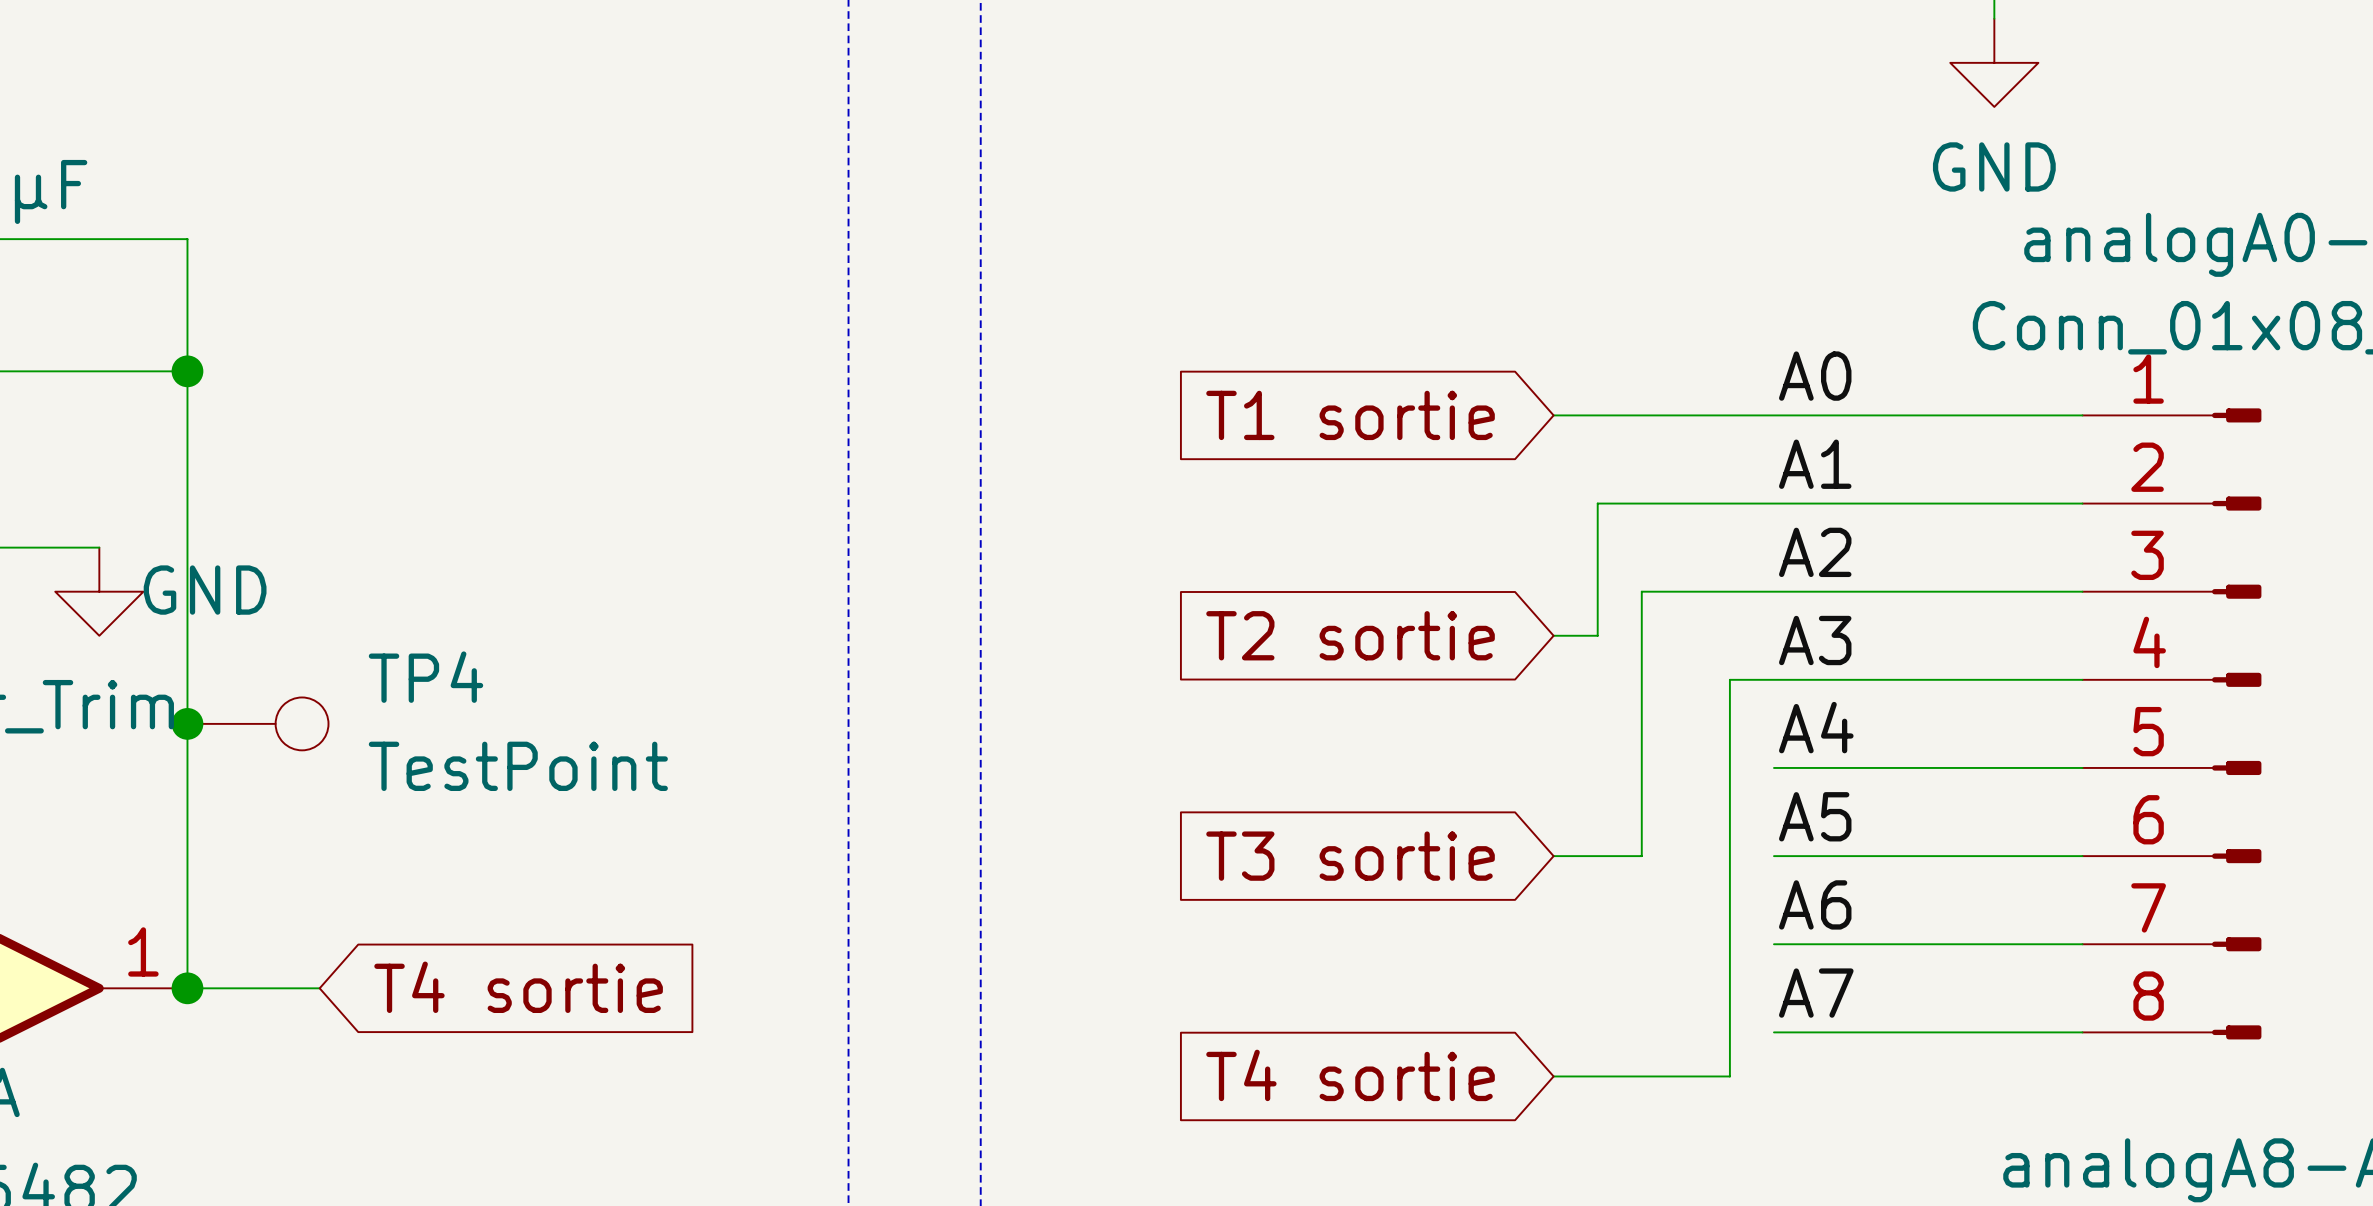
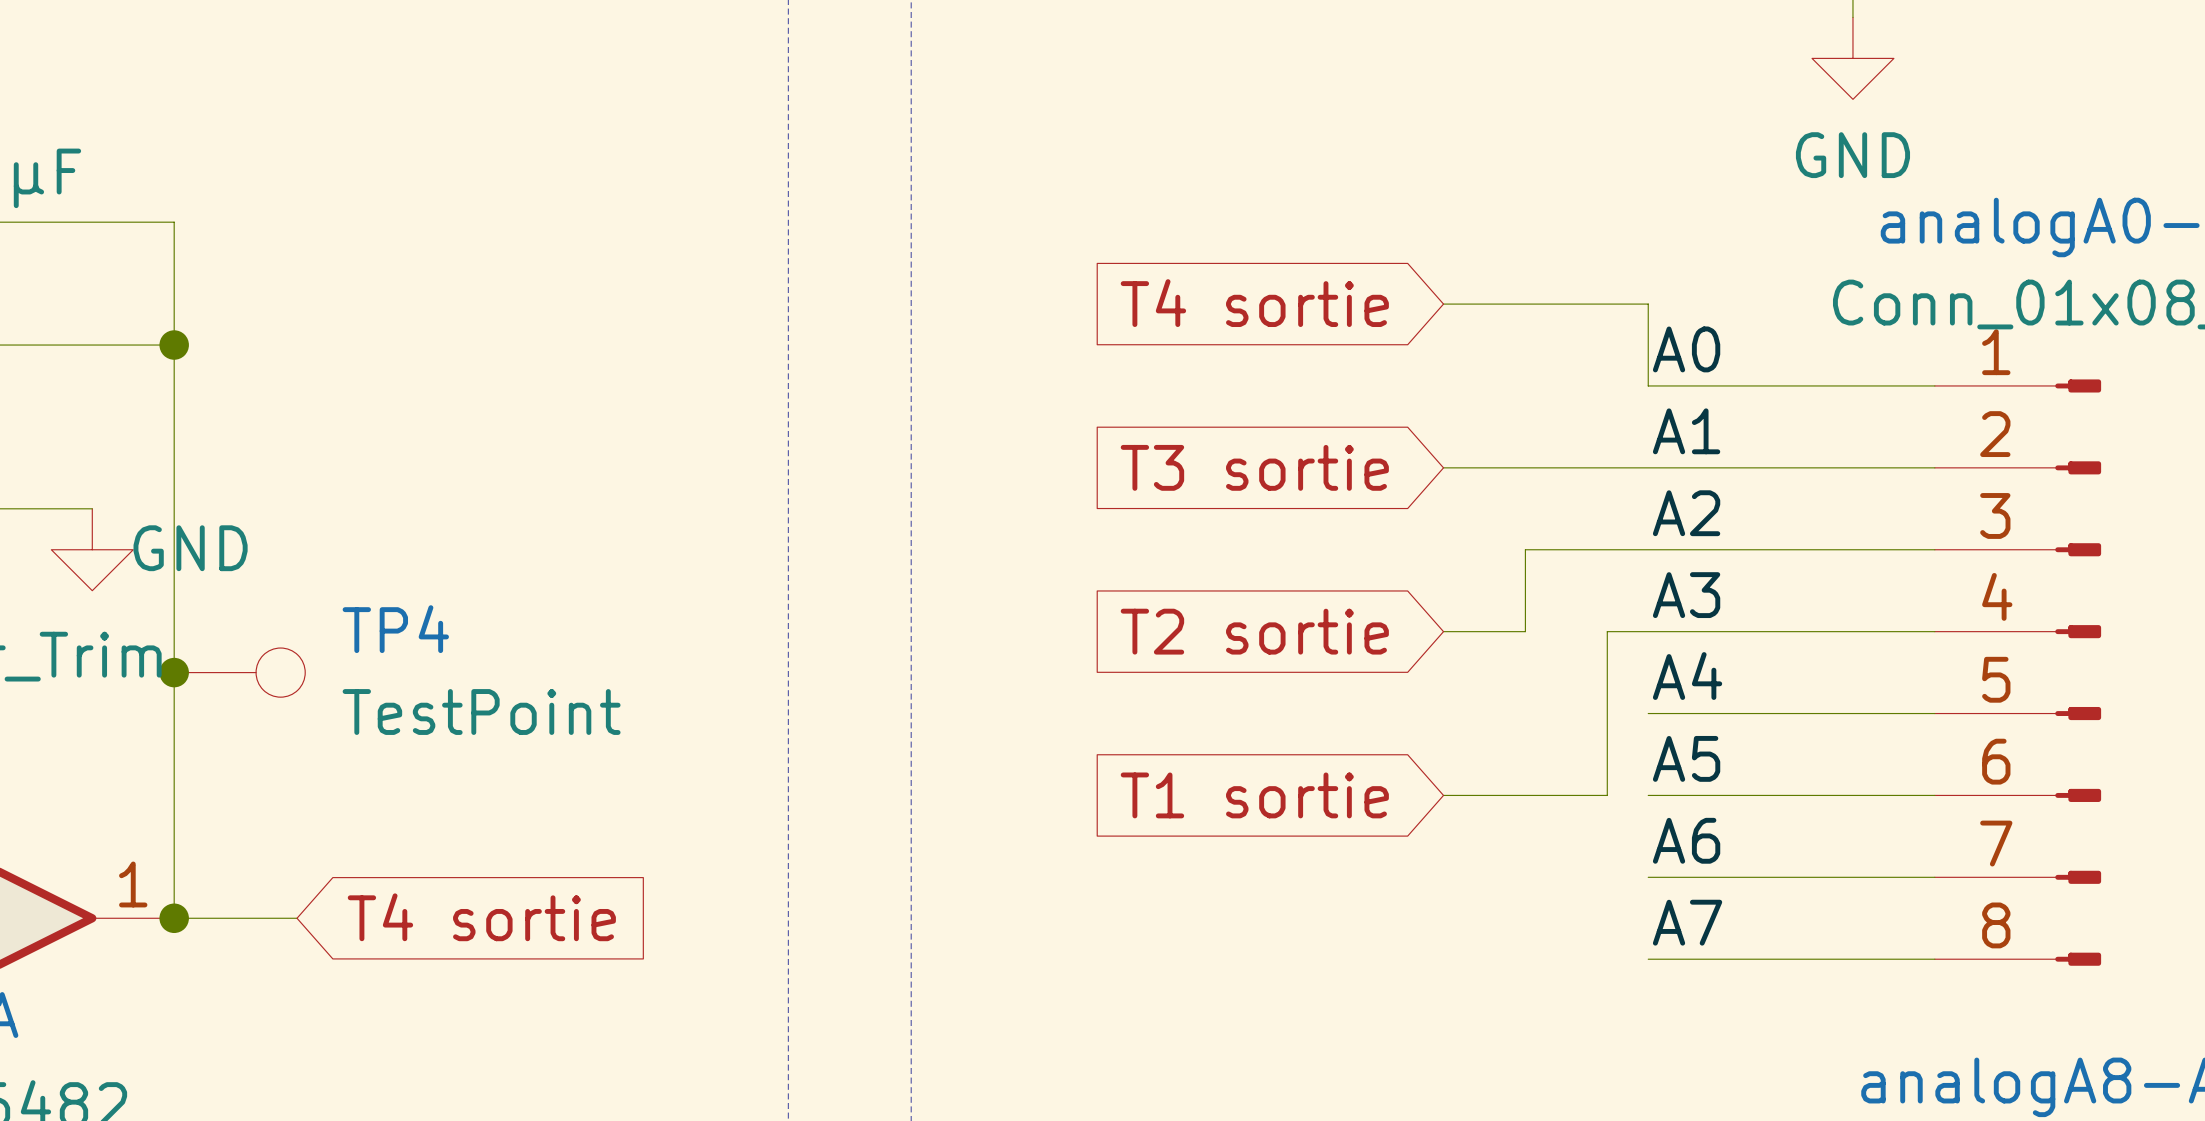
global label: T1 sortie (1350, 415) -> T3 sortie (1254, 467)
wire: (1553, 415) (1773, 415) -> (1443, 304) (1648, 304) (1648, 385)
wire: (1597, 503) (1597, 635) (1553, 635) -> (1484, 467) (1443, 467)
global label position: T2 sortie (1350, 635) -> T2 sortie (1254, 631)
wire: (1641, 679) (1641, 856) -> (1525, 631) (1443, 631)
global label: T3 sortie (1350, 856) -> T1 sortie (1254, 795)
wire: (1729, 856) (1729, 1076) (1553, 1076) -> (1607, 795) (1525, 795)
global label position: T4 sortie (1350, 1075) -> T4 sortie (1254, 303)

